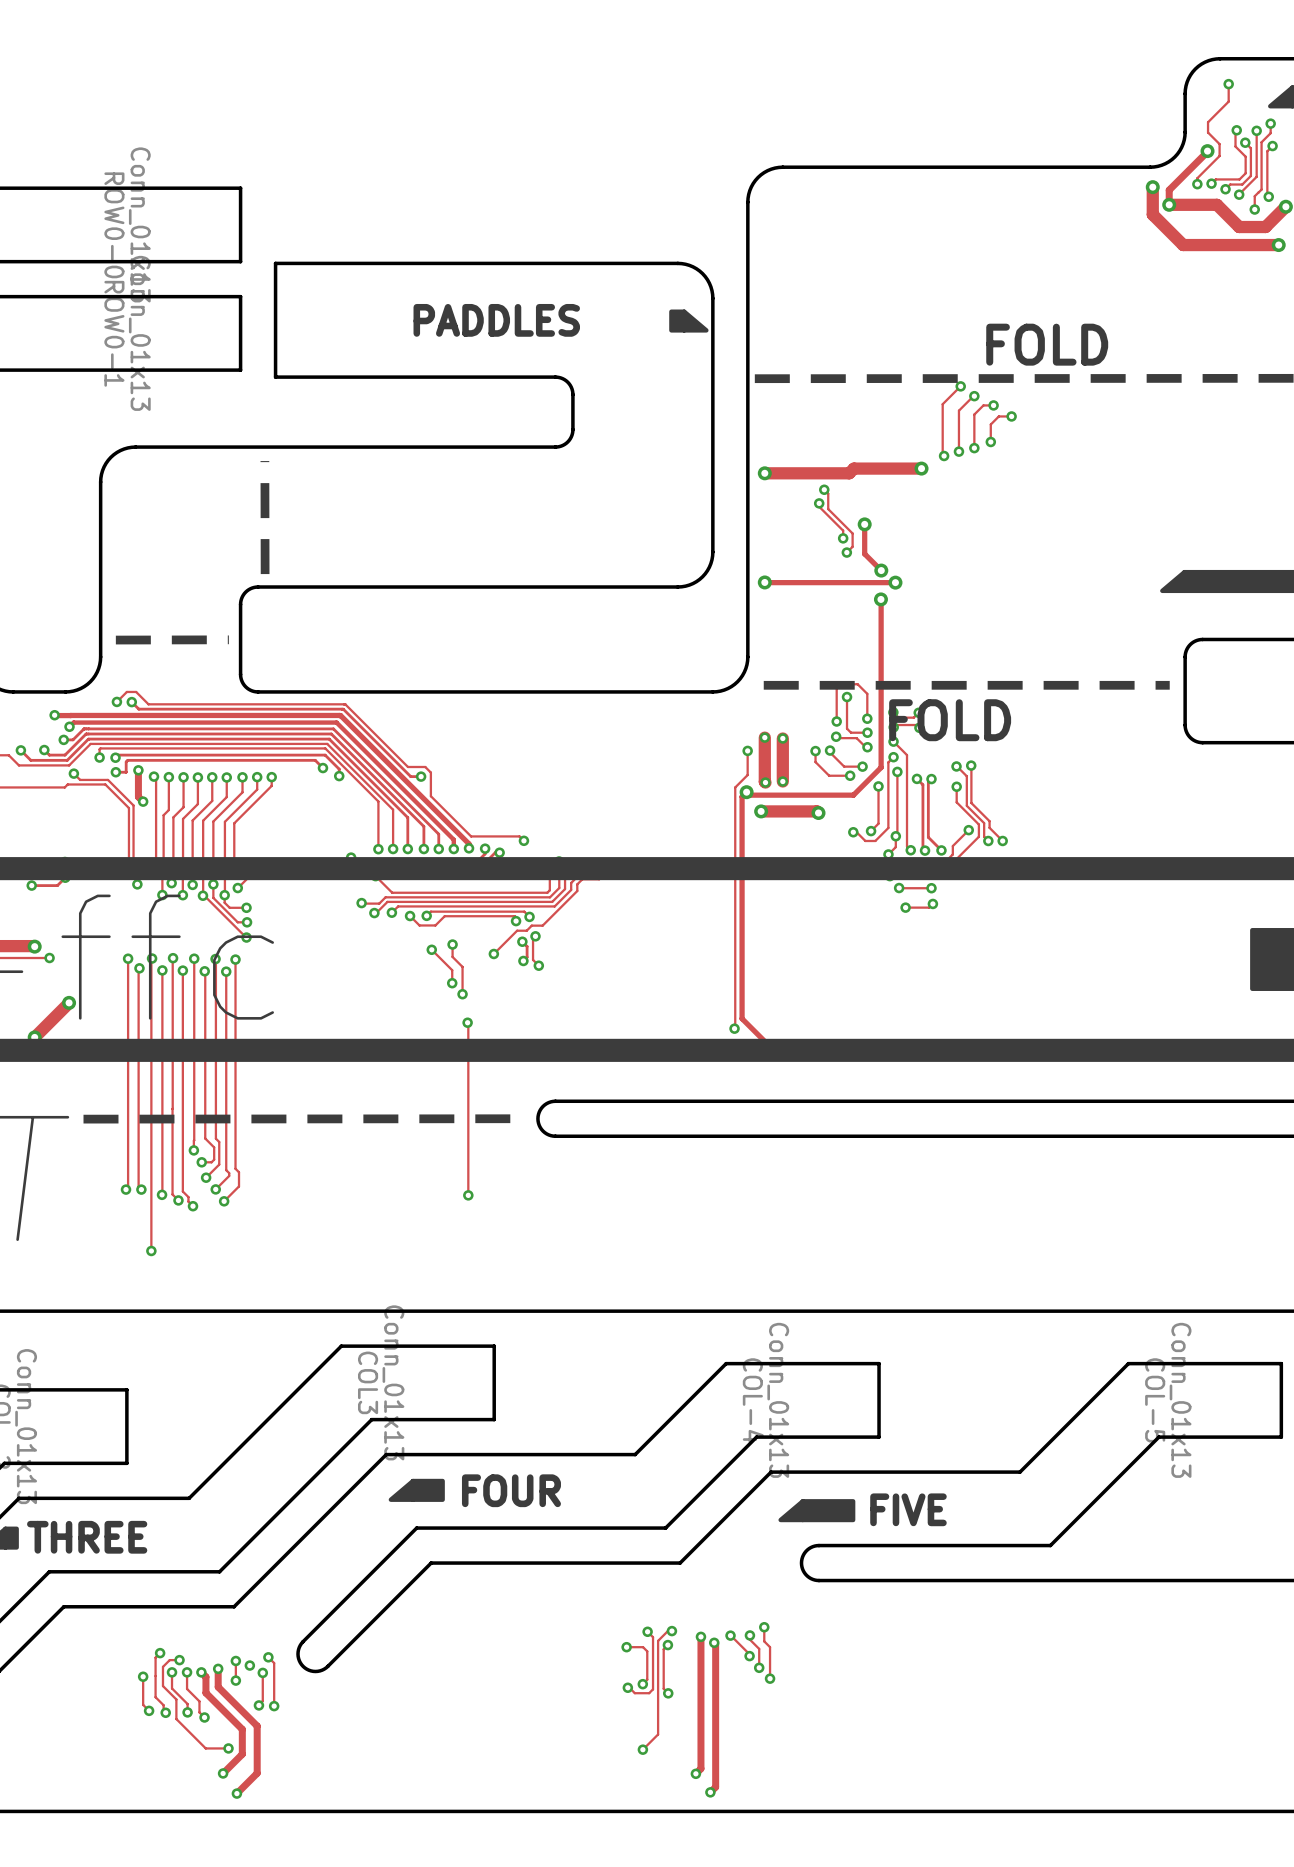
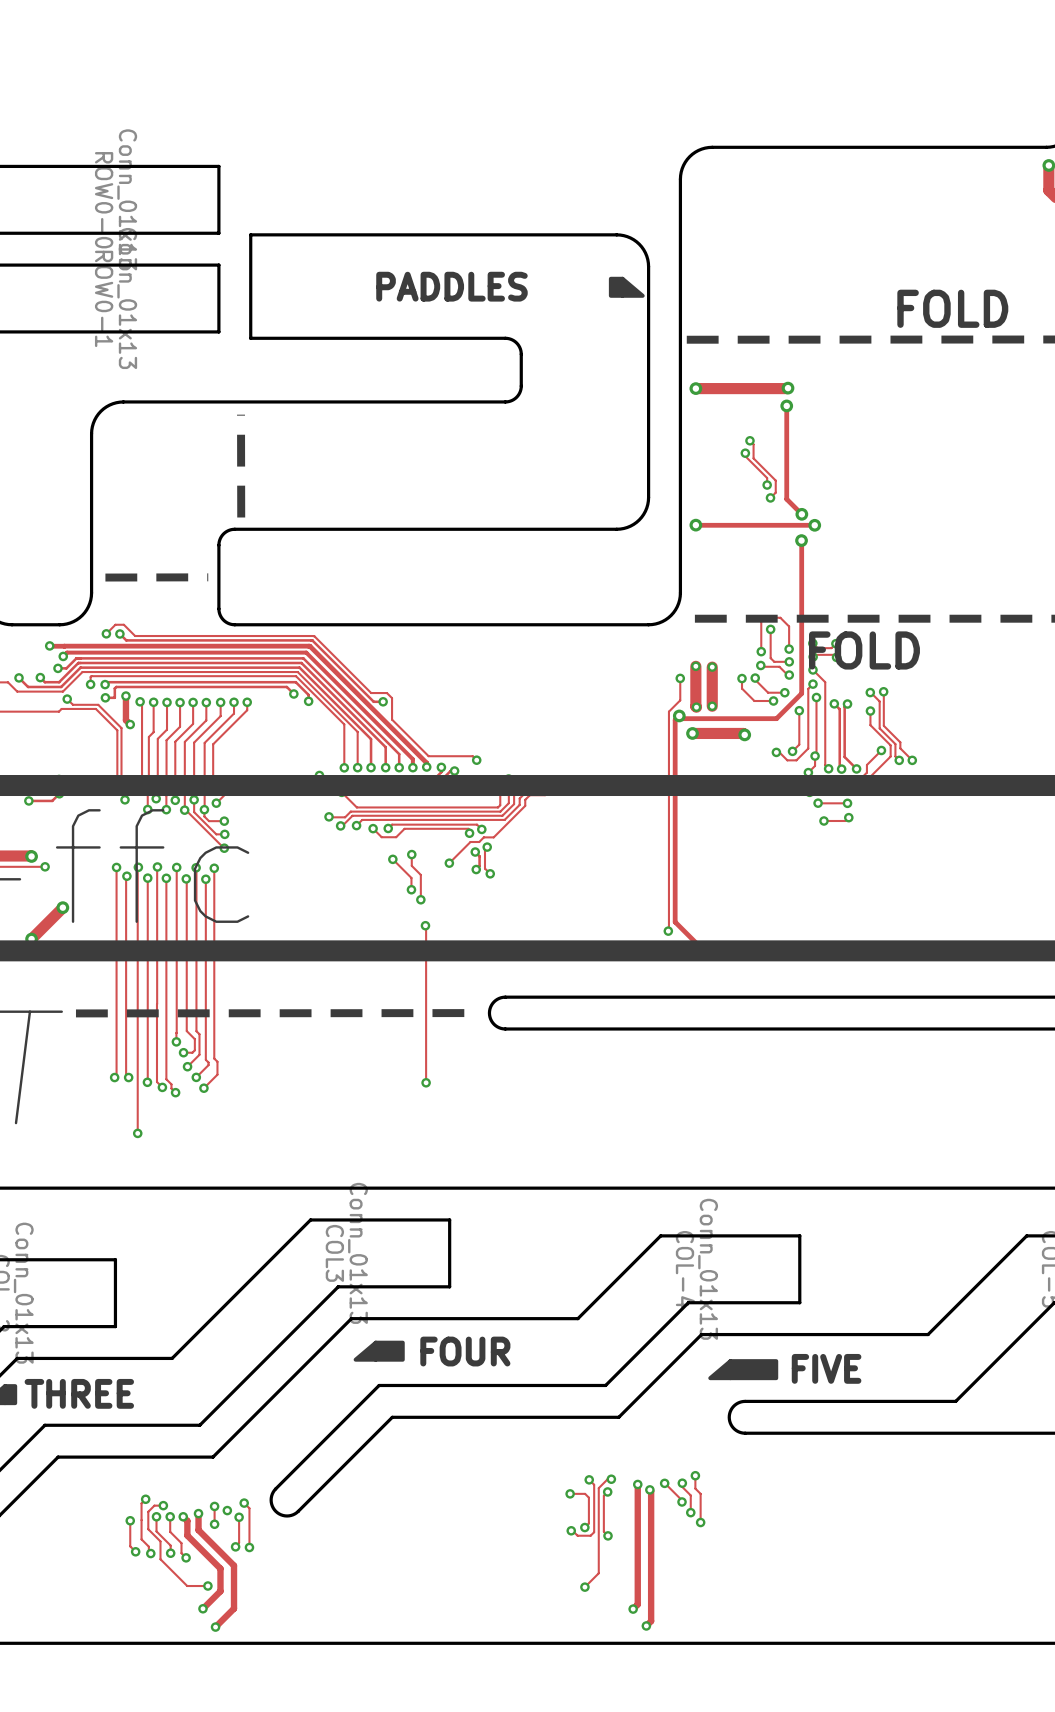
track: (960, 386) (942, 404) (944, 455) -> none
via: (960, 386) -> none
track: (974, 396) (958, 410) (958, 451) -> none
via: (974, 396) -> none
track: (993, 405) (983, 405) (974, 414) (974, 448) -> none
via: (993, 405) -> none
track: (1011, 416) (998, 416) (990, 424) (990, 442) -> none
via: (1011, 416) -> none
track: none -> (788, 388) (695, 388)
via: none -> (788, 388)
via: (990, 442) -> none
via: (974, 448) -> none
track: none -> (786, 405) (786, 472)
via: none -> (786, 405)
via: (958, 451) -> none
via: (944, 455) -> none
track: (921, 468) (854, 468) (849, 473) (764, 473) -> none
via: (921, 468) -> none
via position: (764, 473) -> (695, 388)
via: (864, 524) -> none

